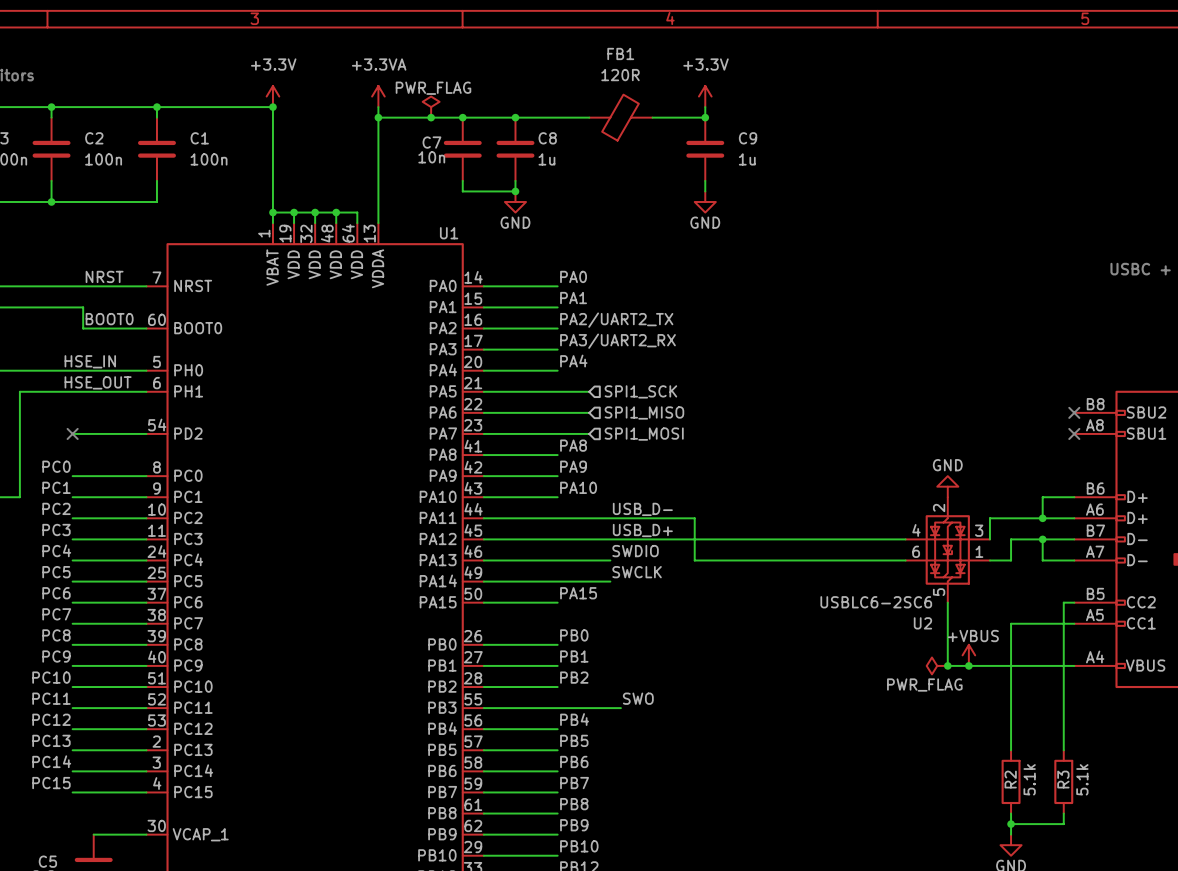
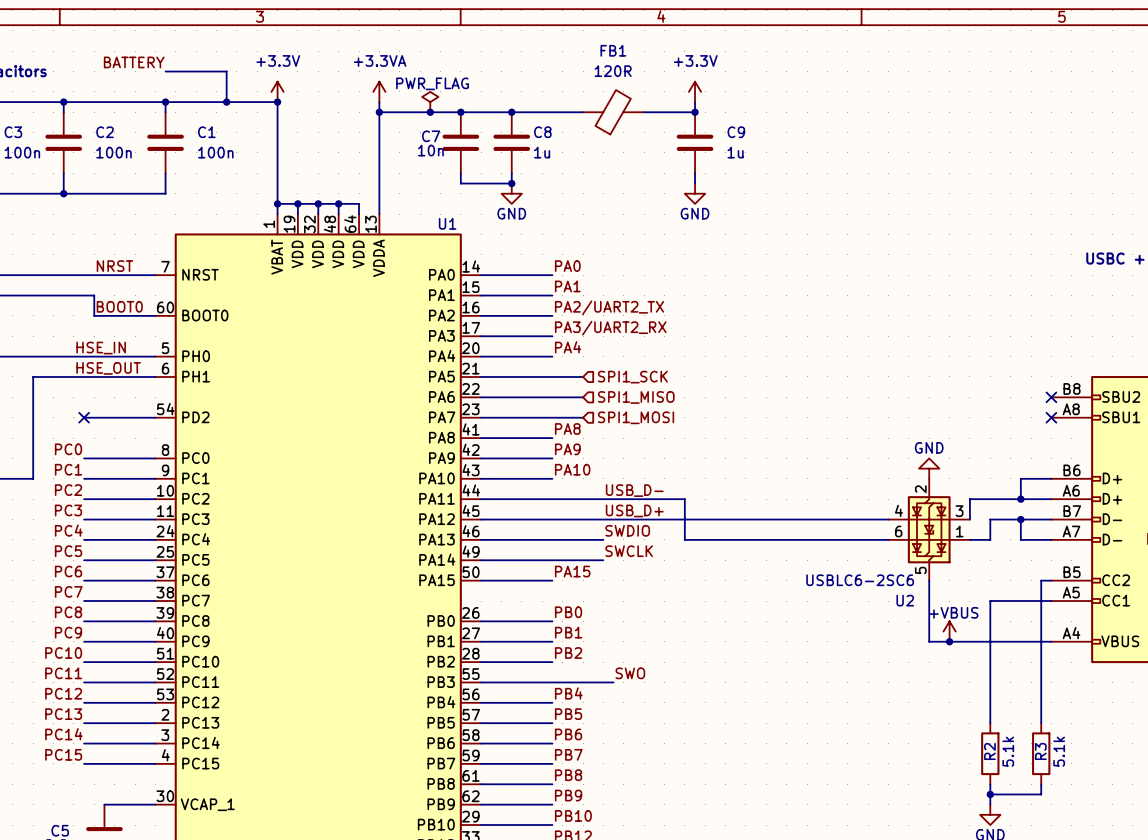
label: none -> BATTERY (134, 62)
wire: none -> (165, 71) (226, 71) (226, 102)
junction: none -> (226, 102)
power symbol: PWR_FLAG (937, 665) -> none
junction: (947, 665) -> none

